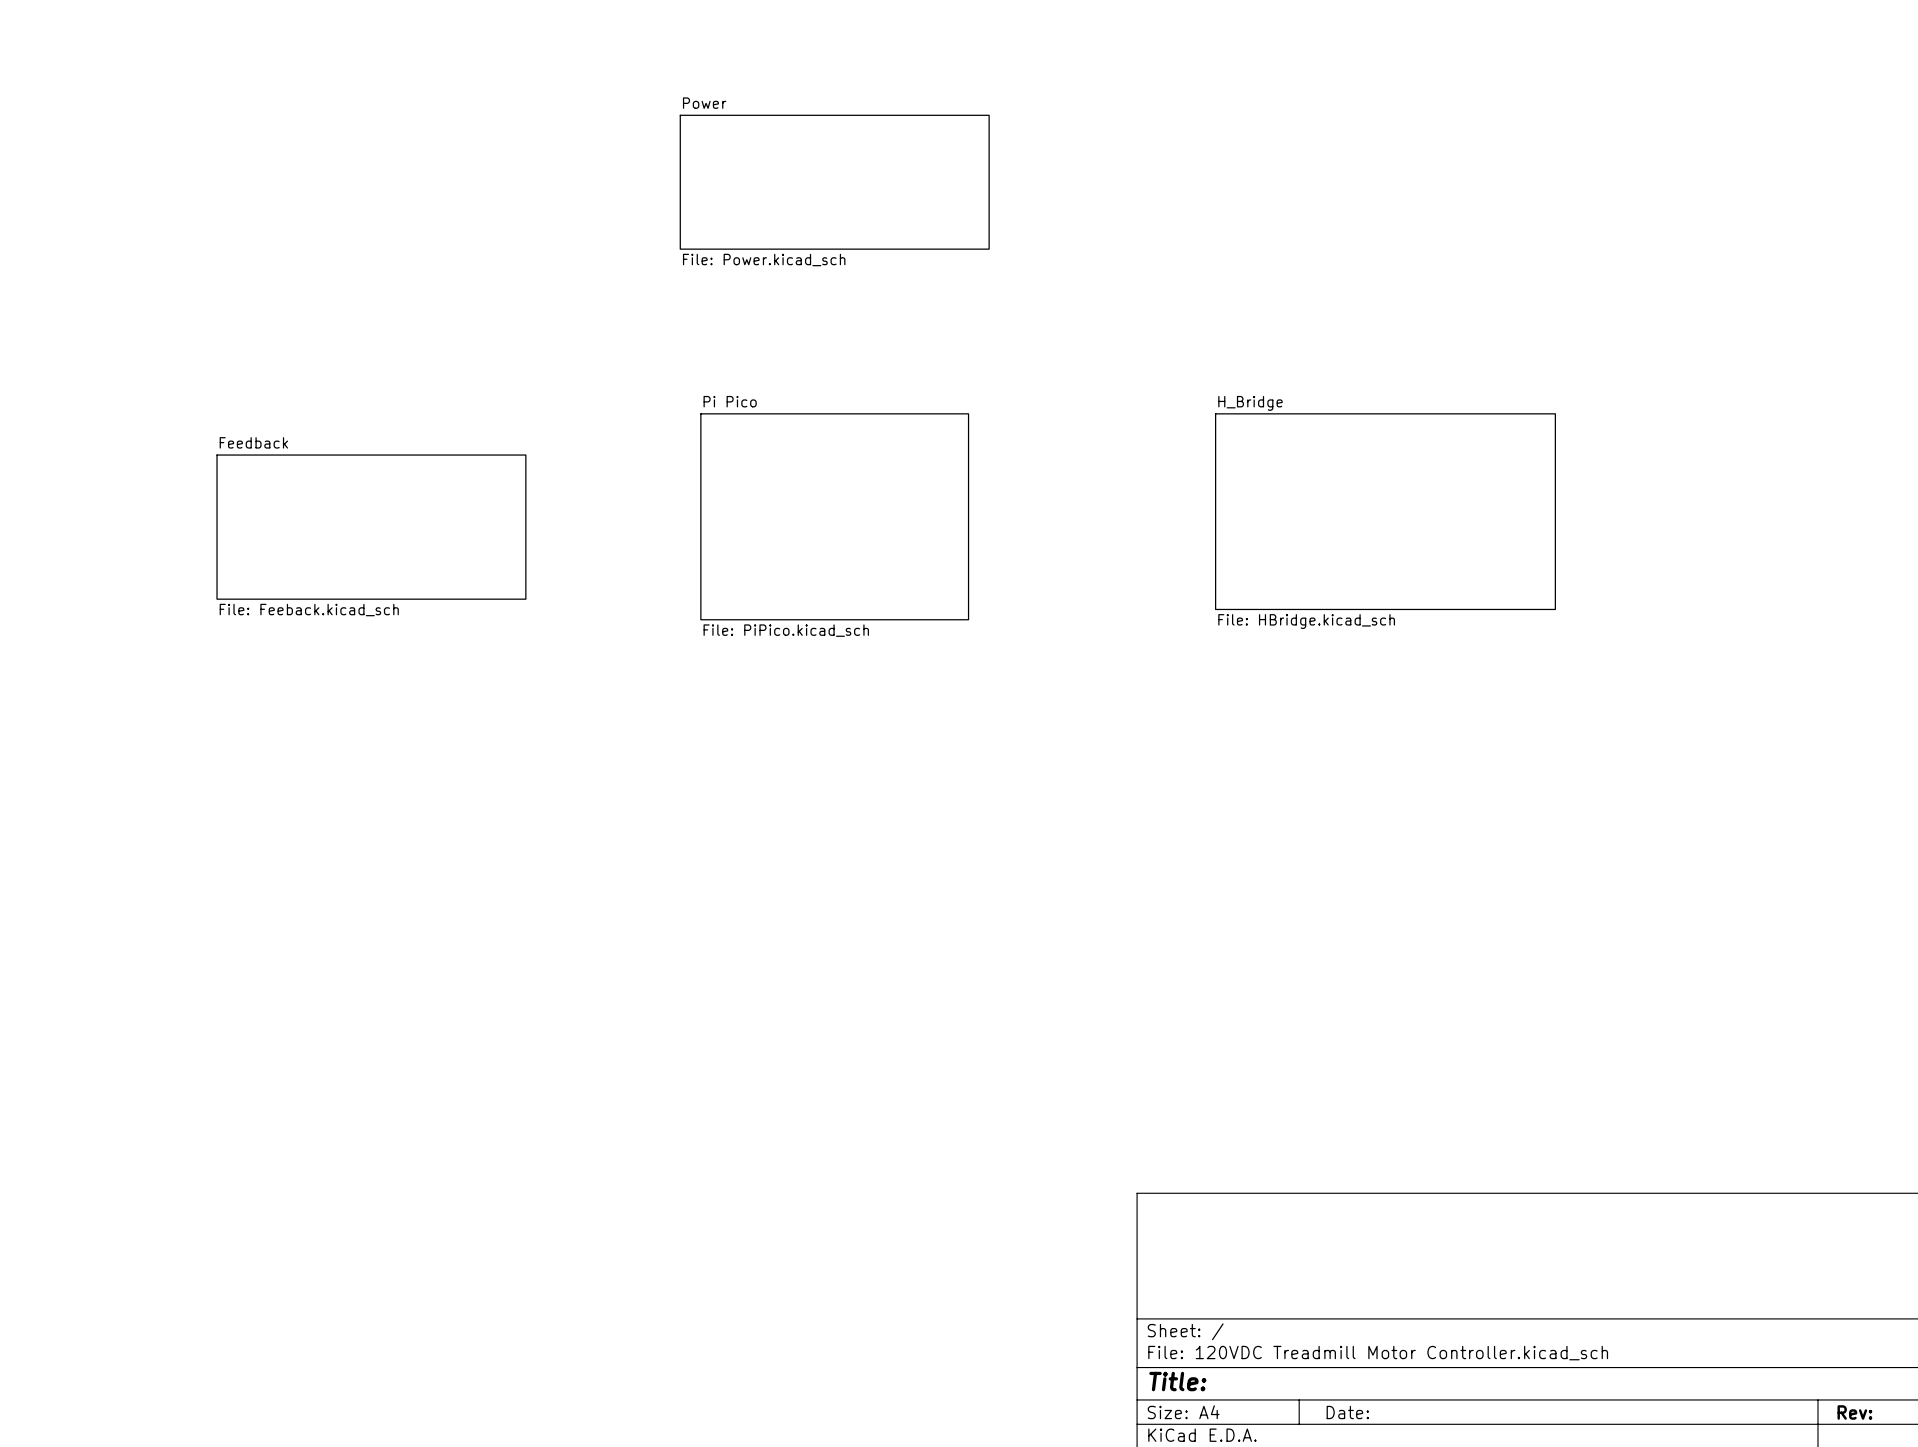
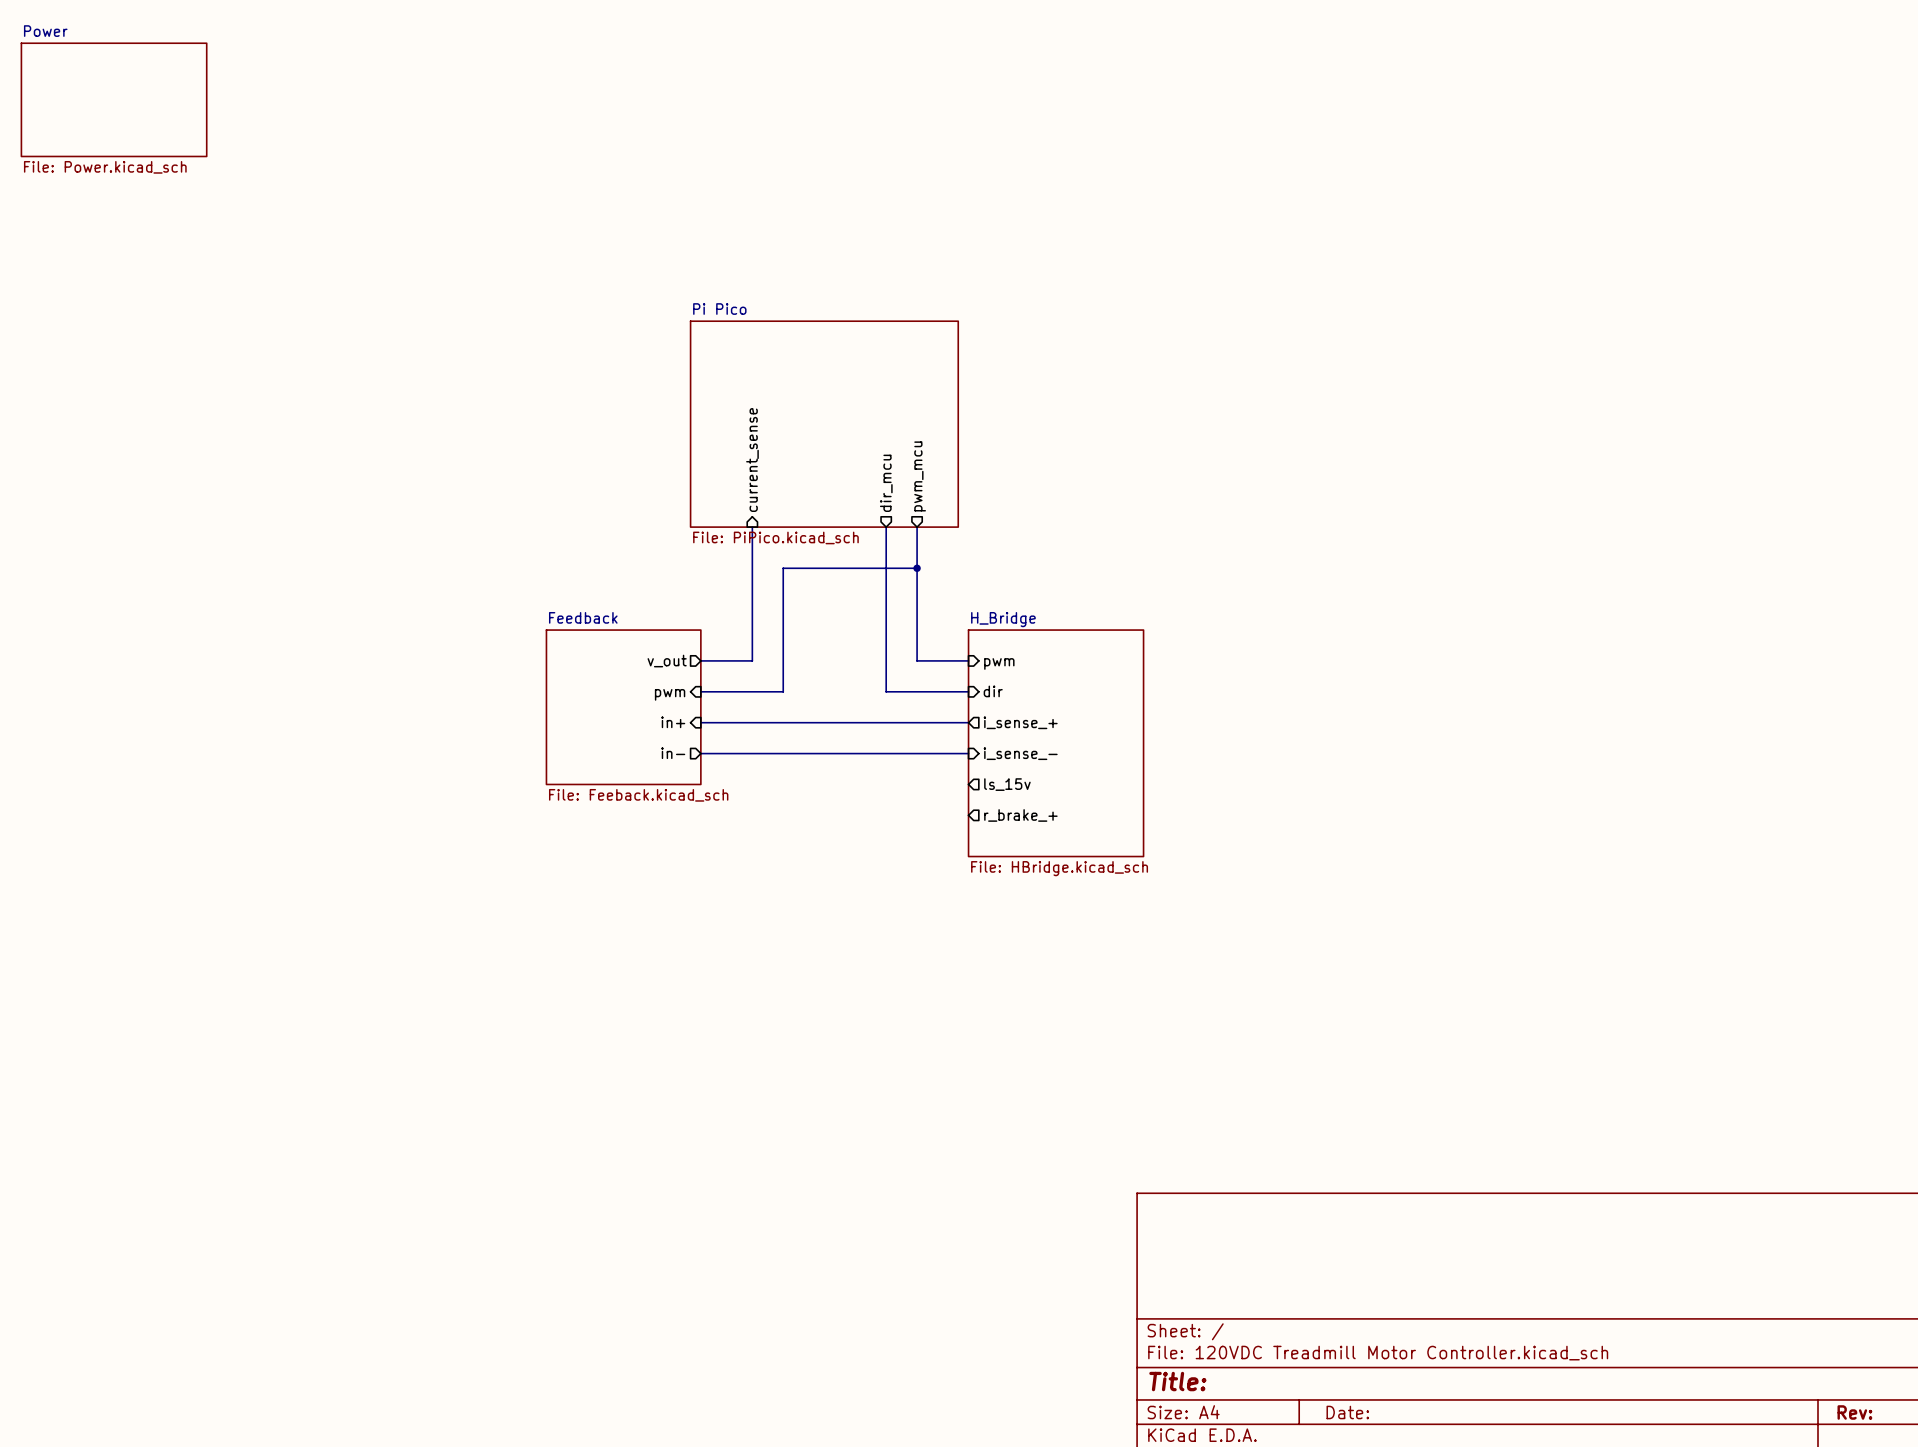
sheet Power: none -> File: Power.kicad_sch (114, 99)
sheet Power: File: Power.kicad_sch (834, 182) -> none
sheet pin: none -> current_sense (752, 460)
sheet pin: none -> pwm_mcu (920, 476)
sheet pin: none -> dir_mcu (886, 483)
sheet H_Bridge: File: HBridge.kicad_sch (1385, 511) -> none
sheet Pi Pico position: (834, 516) -> (824, 424)
sheet Feedback: File: Feeback.kicad_sch (371, 527) -> none
wire: none -> (752, 527) (752, 660) (700, 660)
wire: none -> (886, 527) (886, 691) (968, 691)
wire: none -> (917, 527) (917, 660) (968, 660)
wire: none -> (917, 568) (783, 568) (783, 691) (700, 691)
junction: none -> (917, 568)
sheet pin: none -> v_out (667, 661)
sheet pin: none -> pwm (999, 663)
sheet pin: none -> dir (993, 691)
sheet pin: none -> pwm (670, 694)
sheet Feedback: none -> File: Feeback.kicad_sch (623, 707)
sheet pin: none -> in+ (673, 722)
wire: none -> (700, 722) (968, 722)
sheet pin: none -> i_sense_+ (1020, 722)
sheet H_Bridge: none -> File: HBridge.kicad_sch (1056, 743)
sheet pin: none -> in- (673, 753)
wire: none -> (700, 753) (968, 753)
sheet pin: none -> i_sense_- (1020, 753)
sheet pin: none -> ls_15v (1007, 784)
sheet pin: none -> r_brake_+ (1020, 815)

